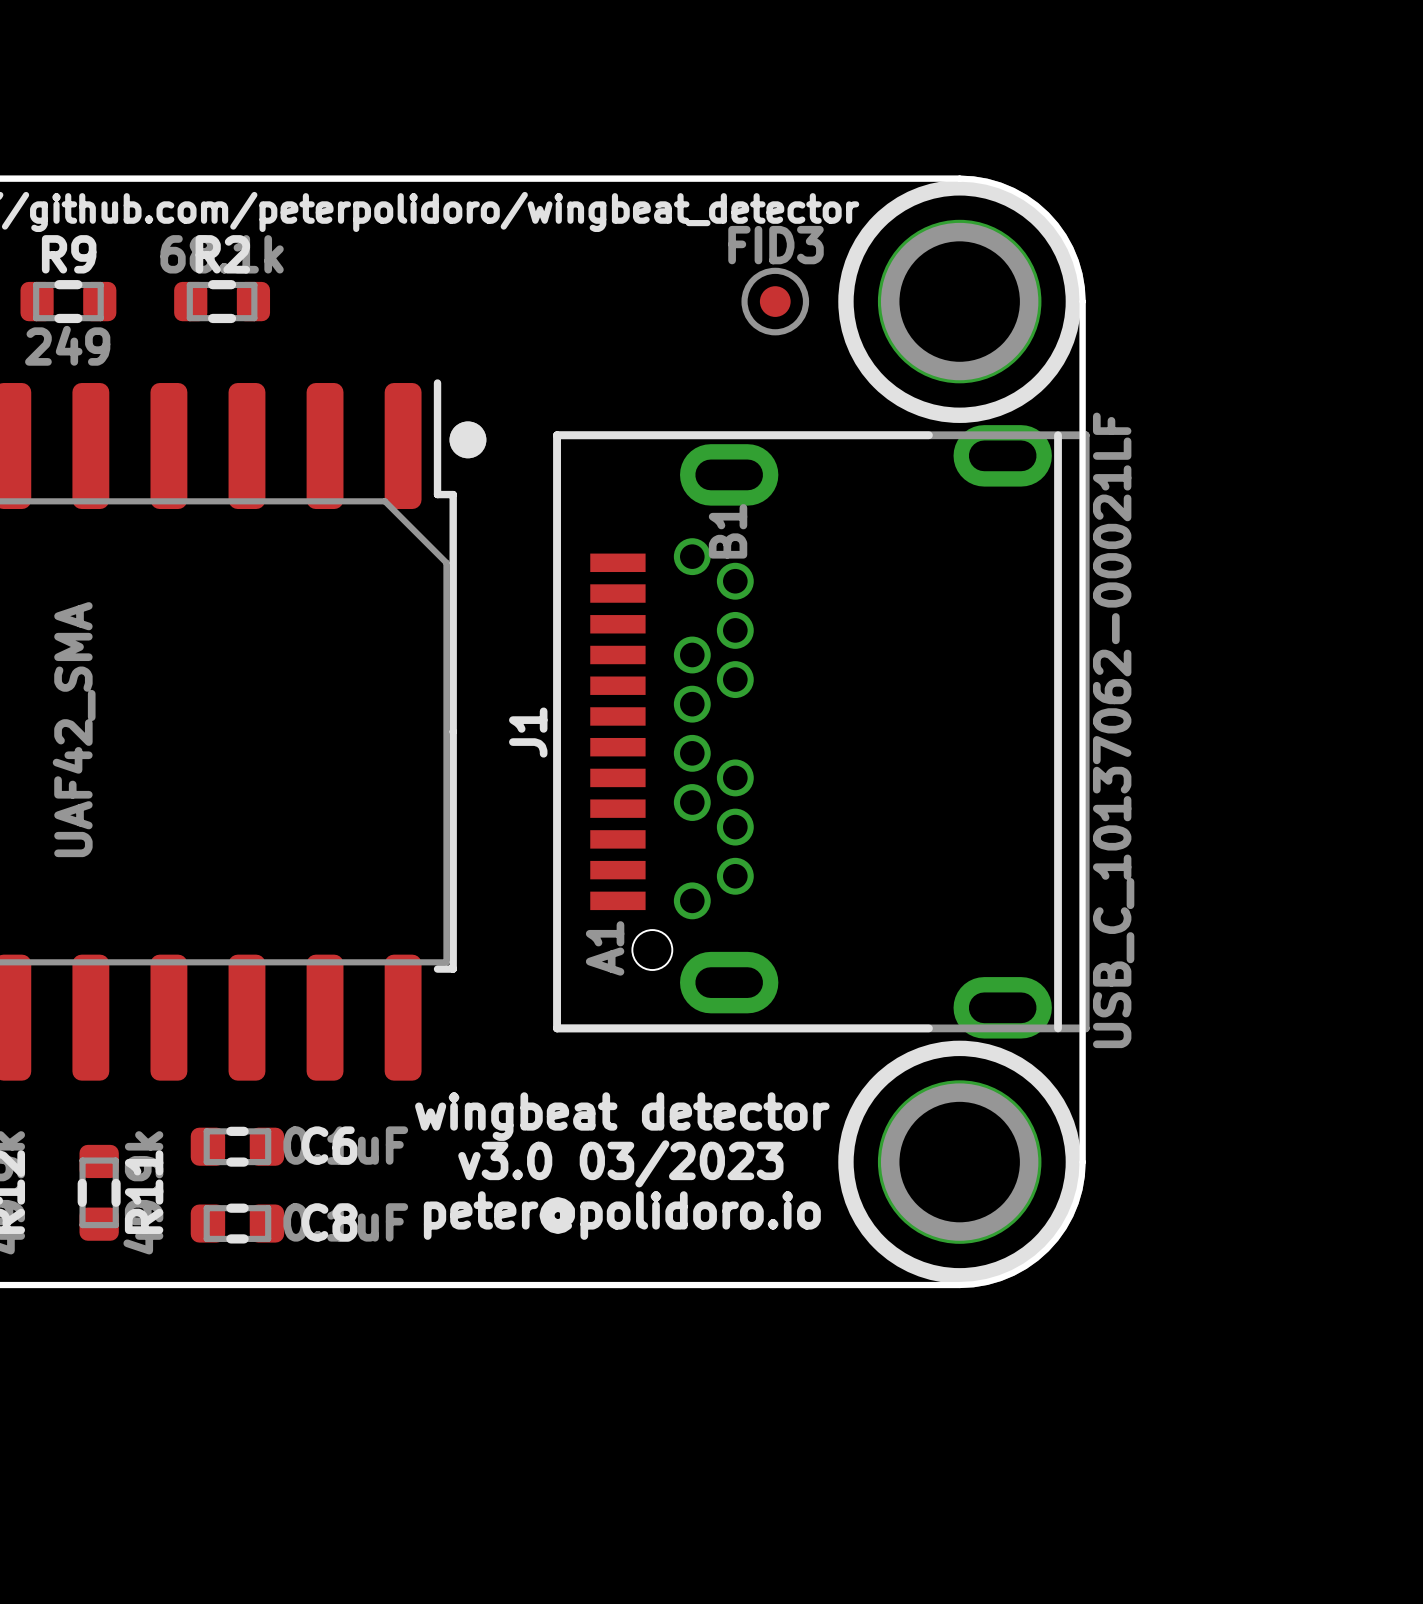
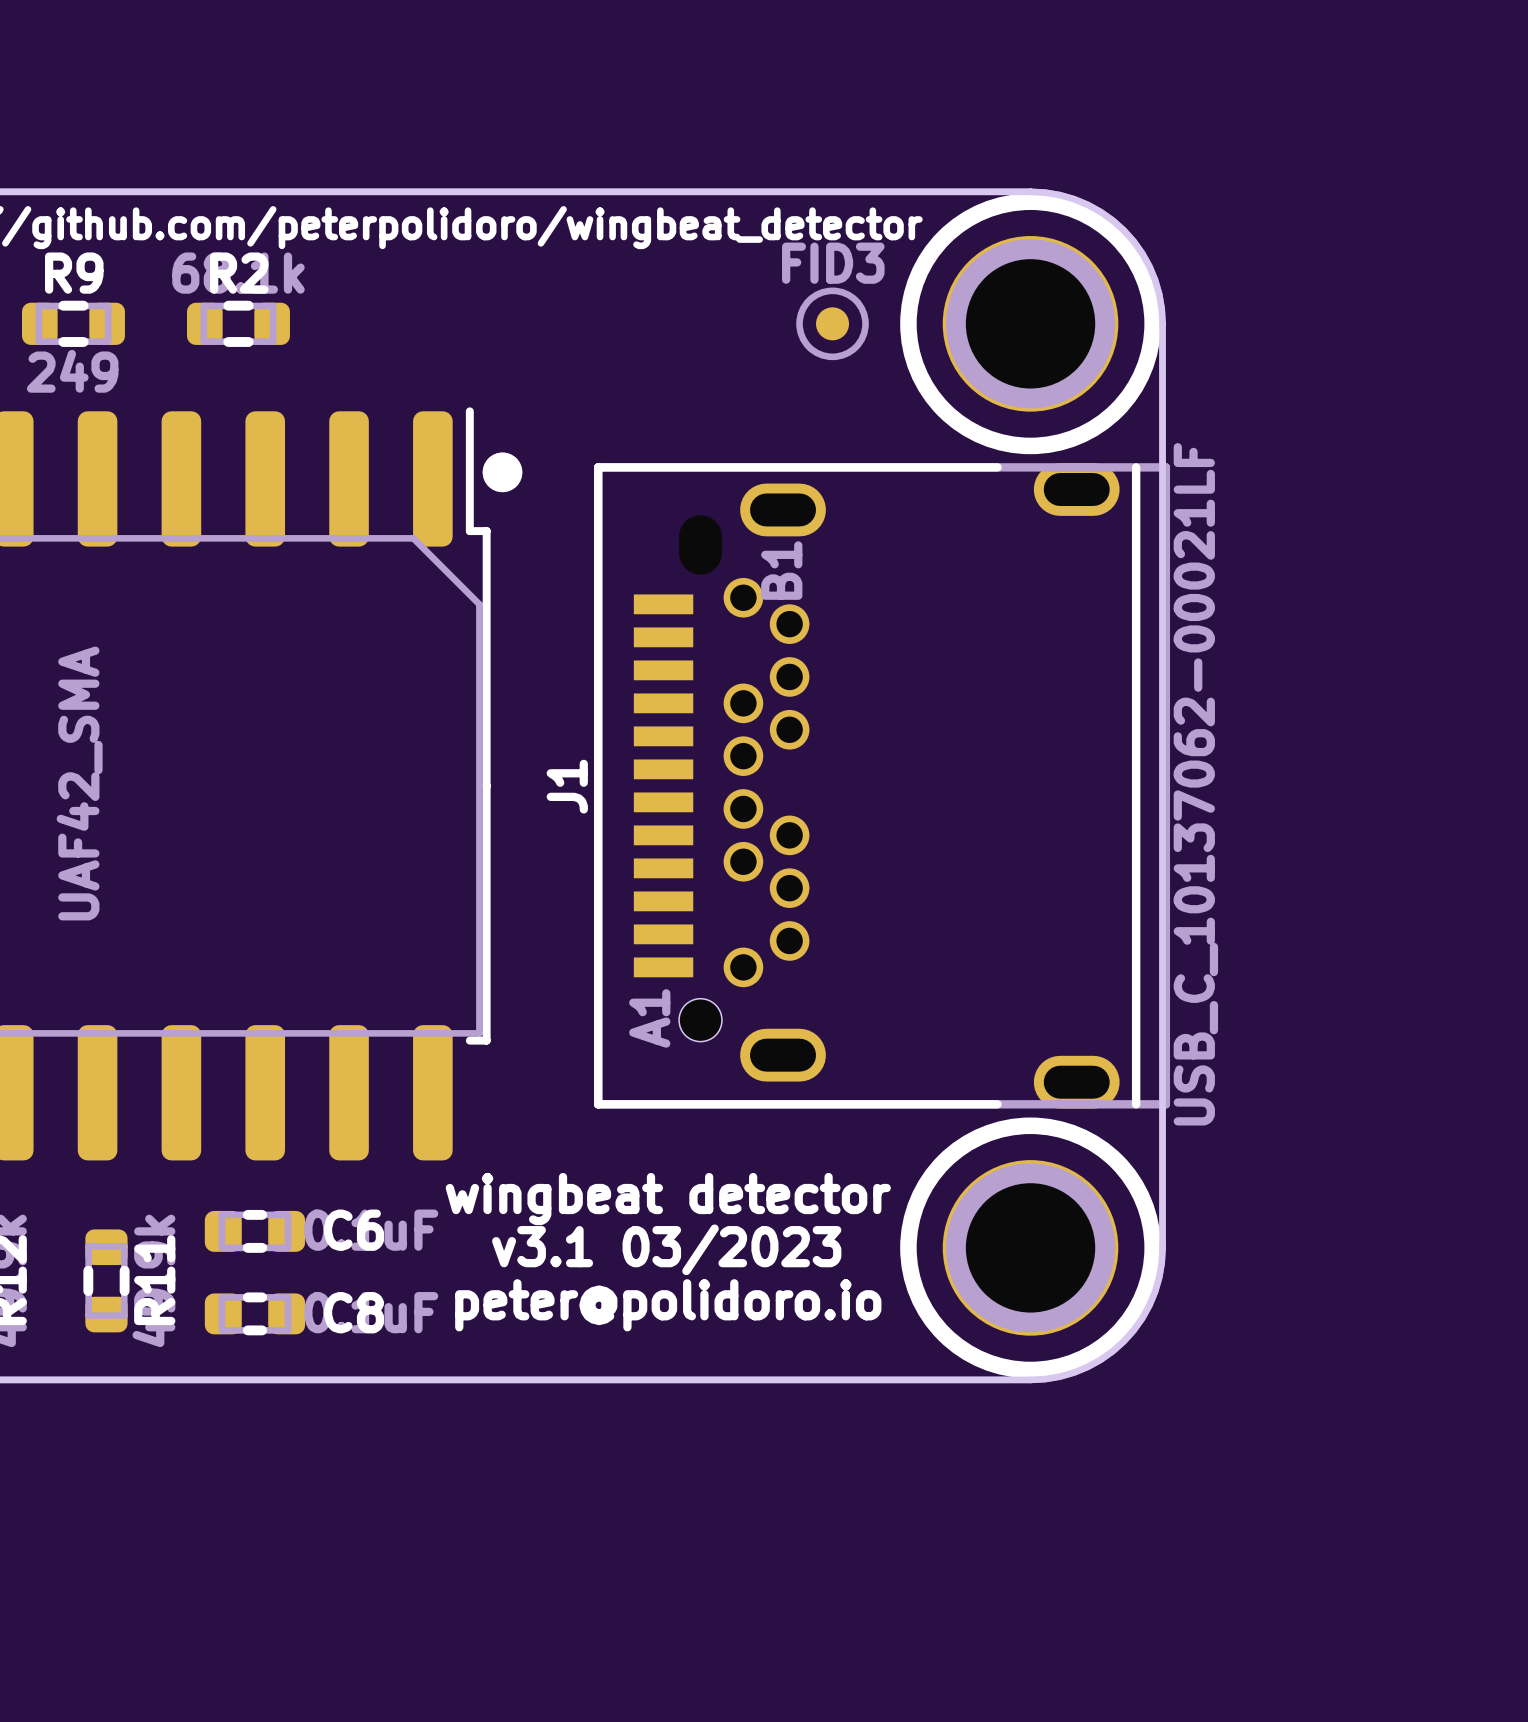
J1 footprint: [553, 425, 1090, 1039] -> [594, 463, 1171, 1109]
text: v3.0 03/2023 (620, 1163) -> v3.1 03/2023 (666, 1249)

